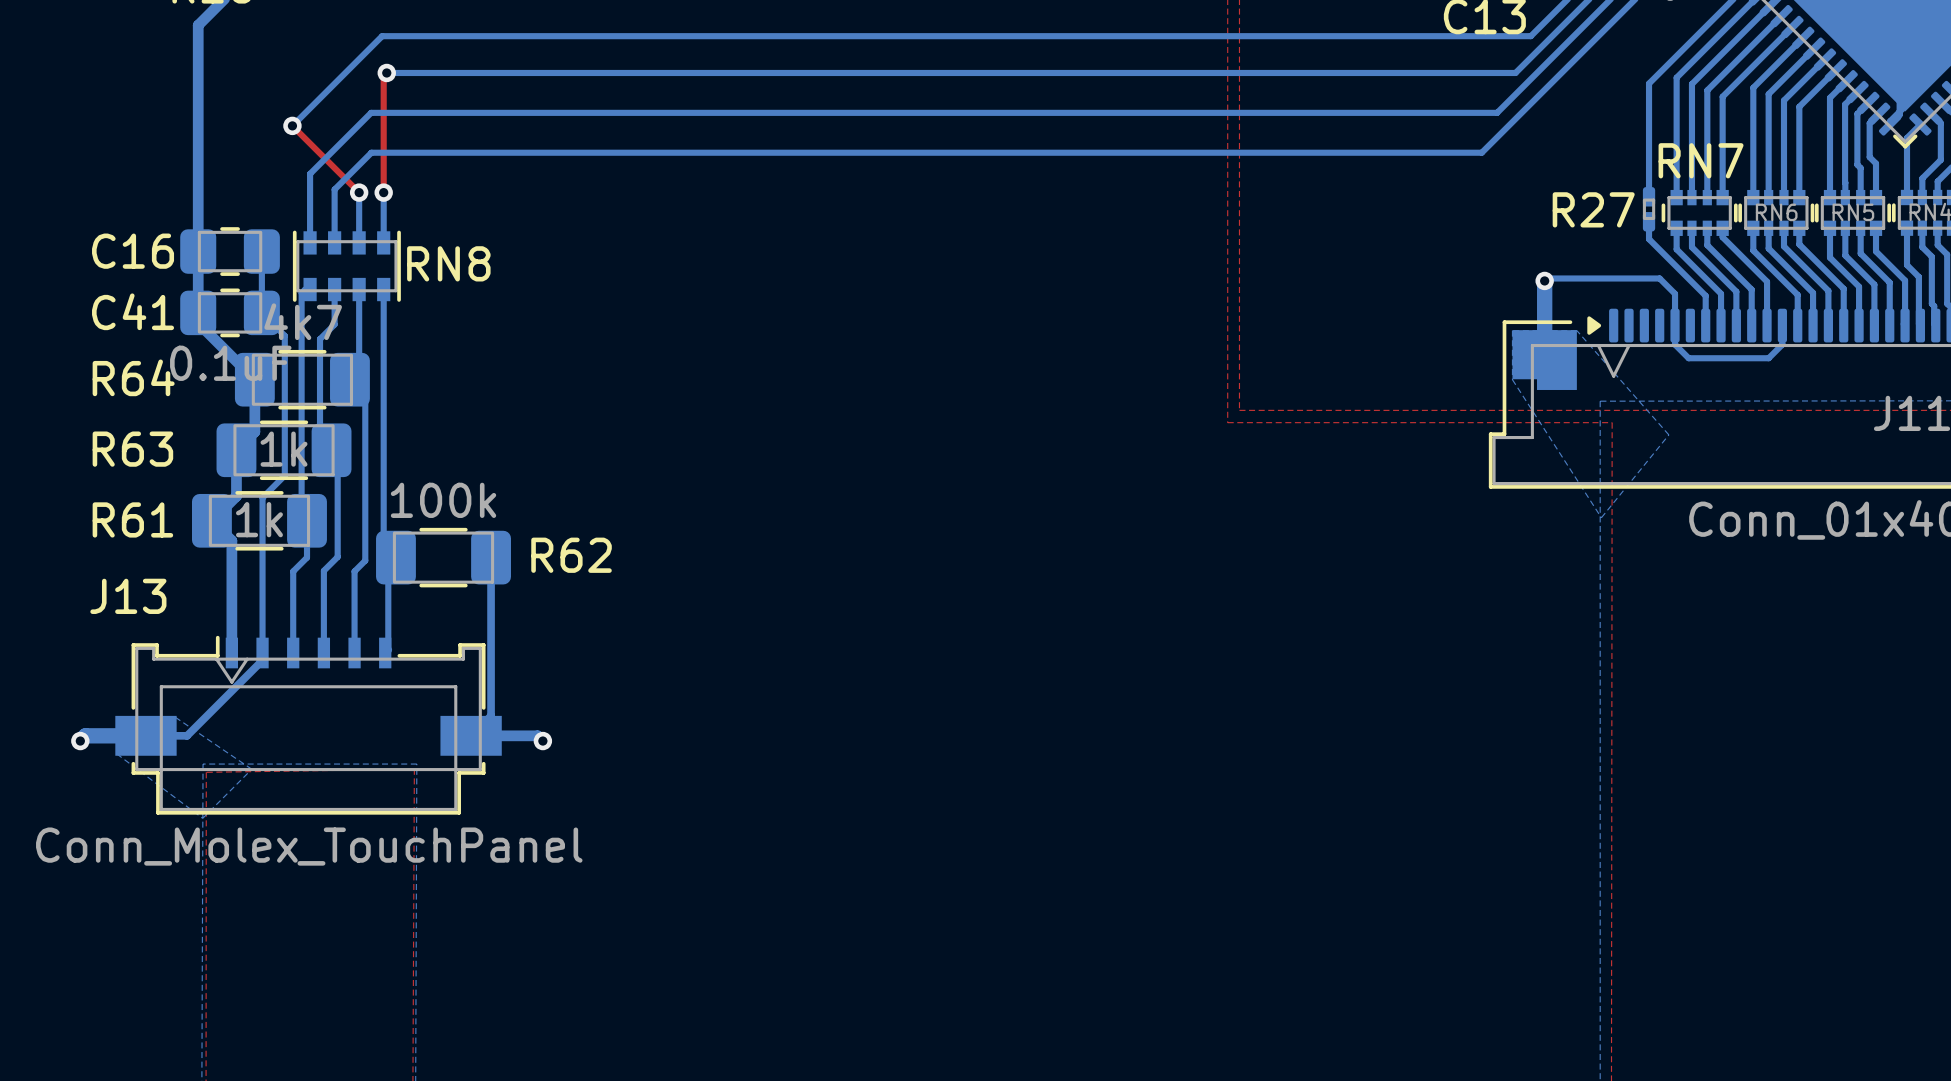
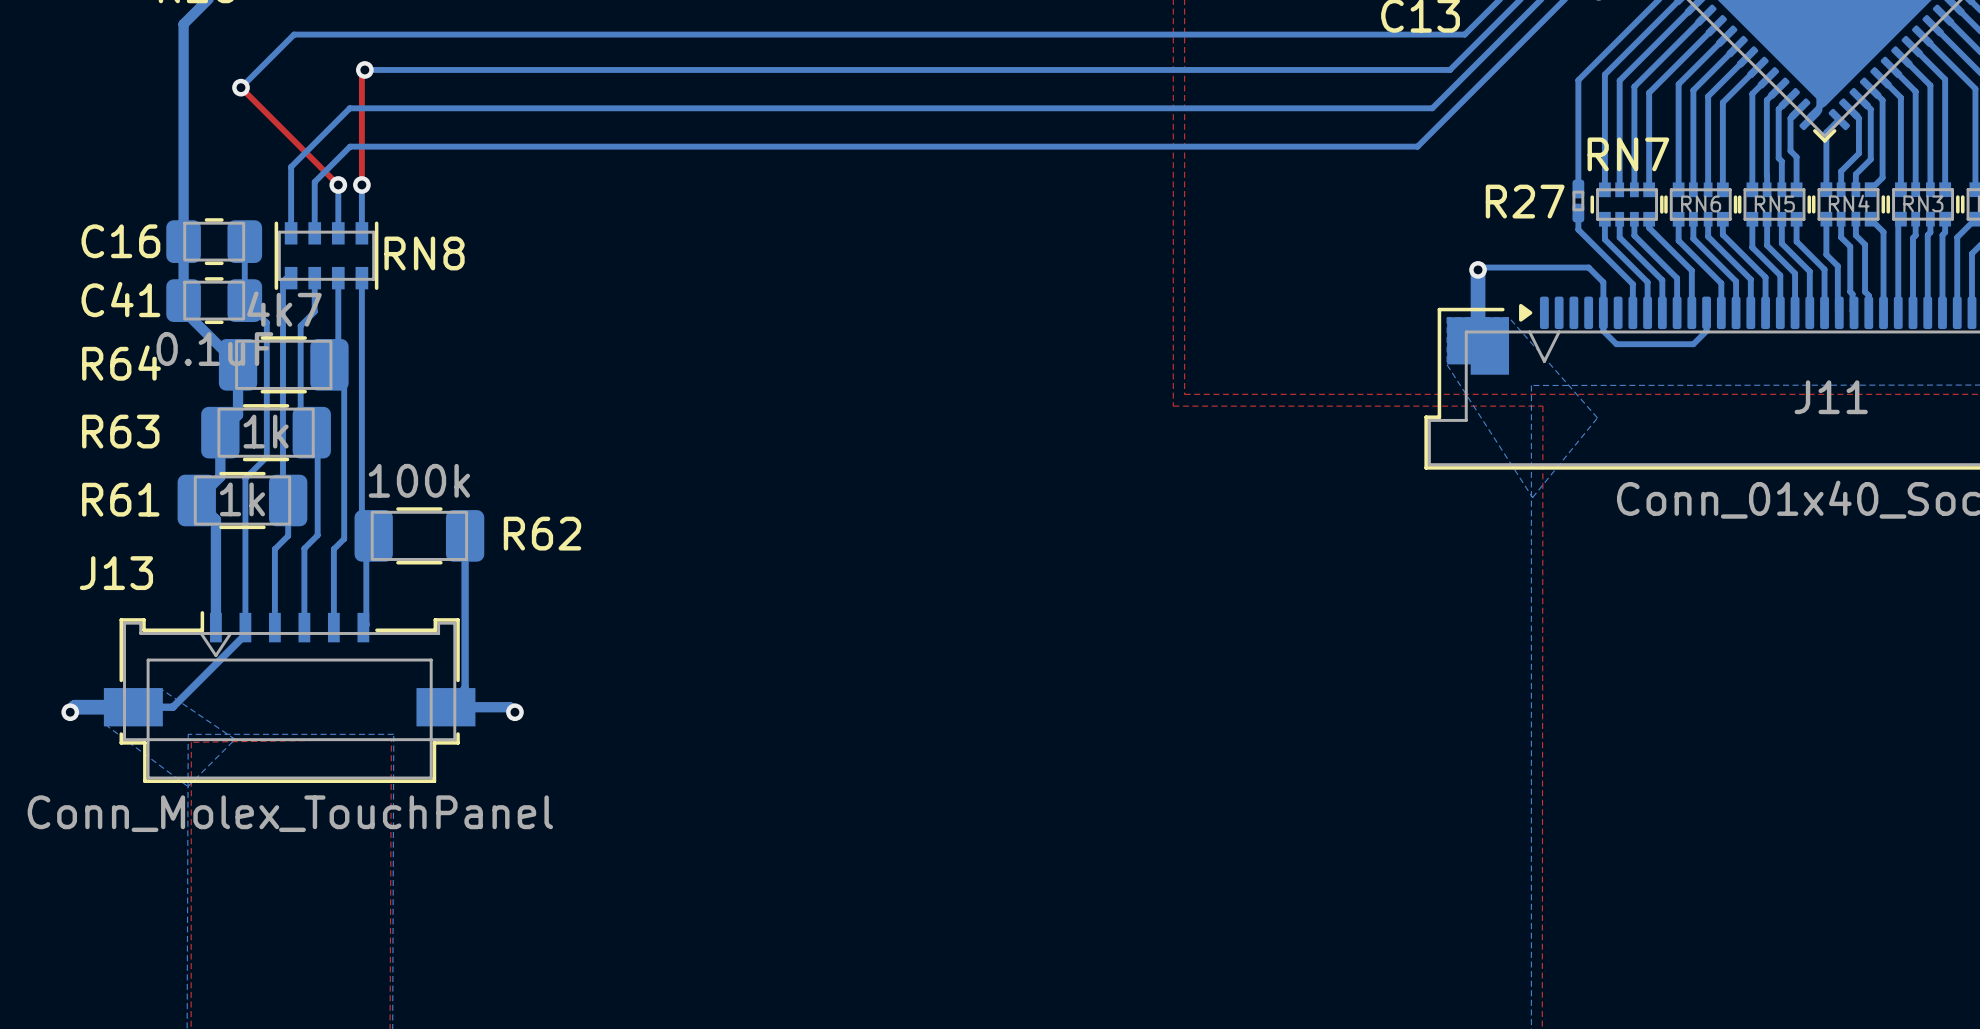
bottom track: (382, 36) (292, 125) -> (360, 34) (294, 34) (240, 87)
top track: none -> (240, 87) (274, 120)
via position: (292, 125) -> (240, 87)

